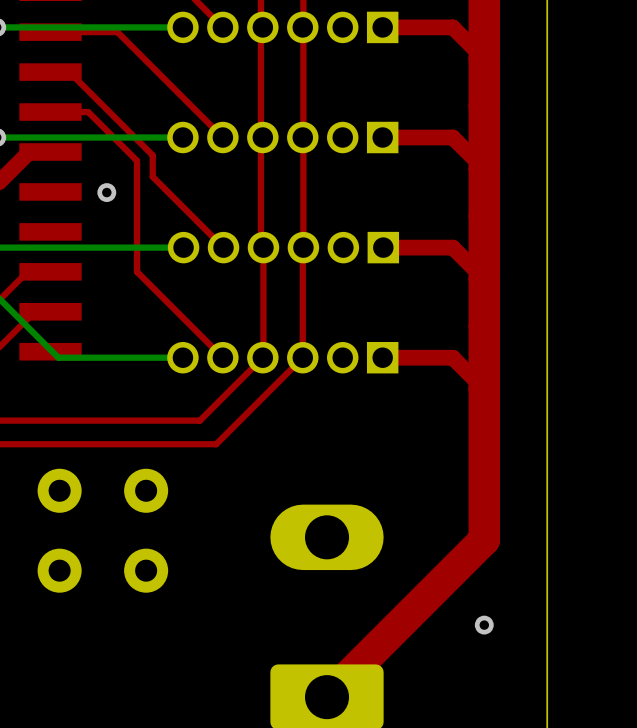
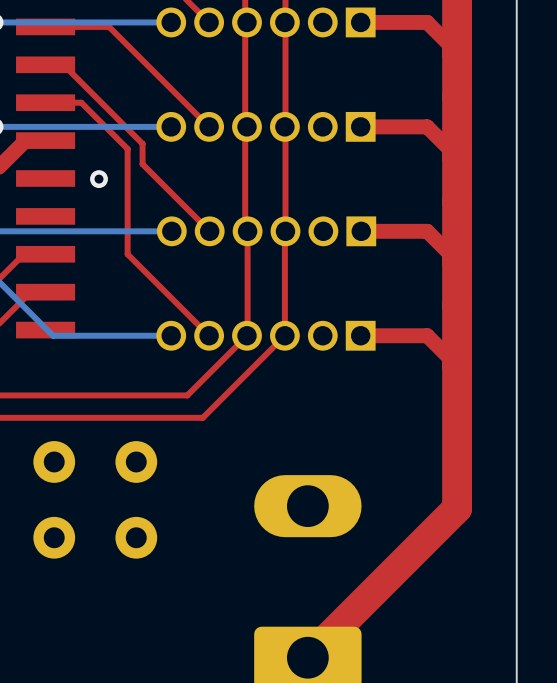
via: (484, 625) -> none

